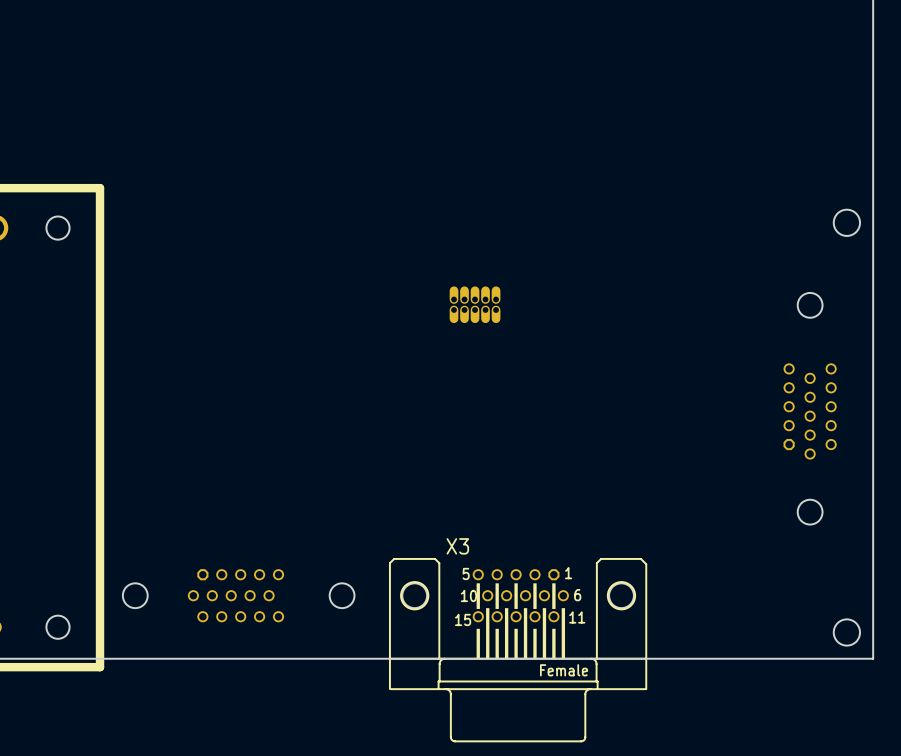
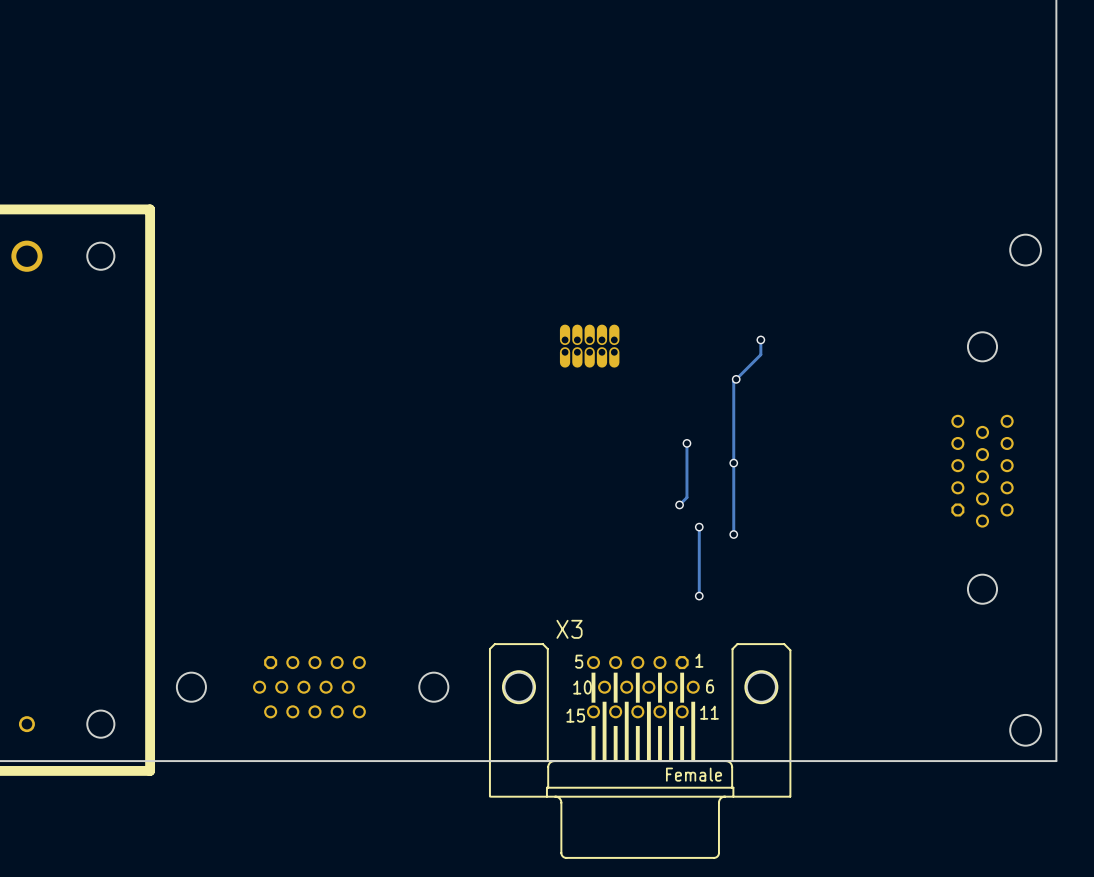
track: none -> (760, 339) (760, 354) (733, 381) (733, 534)
via: none -> (760, 339)
via: none -> (736, 379)
track: none -> (686, 443) (686, 497) (679, 504)
via: none -> (686, 443)
via: none -> (733, 463)
via: none -> (679, 504)
track: none -> (699, 527) (699, 596)
via: none -> (699, 527)
via: none -> (733, 534)
via: none -> (699, 596)

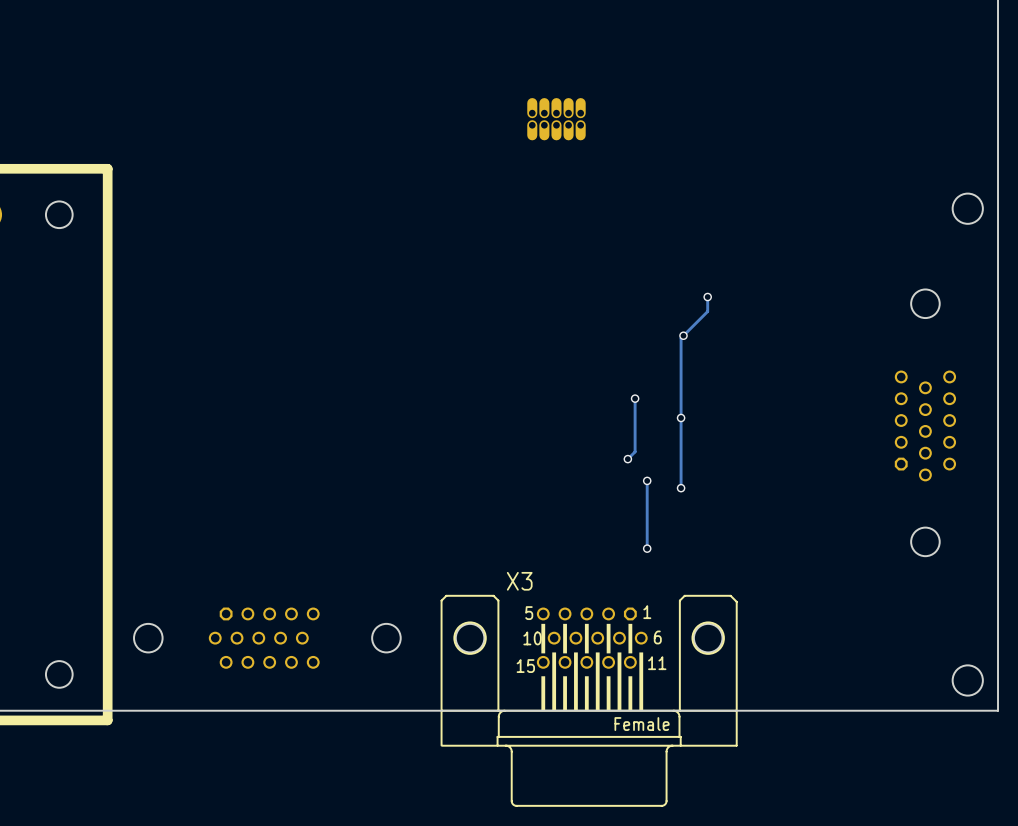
part position: (589, 346) -> (556, 119)

